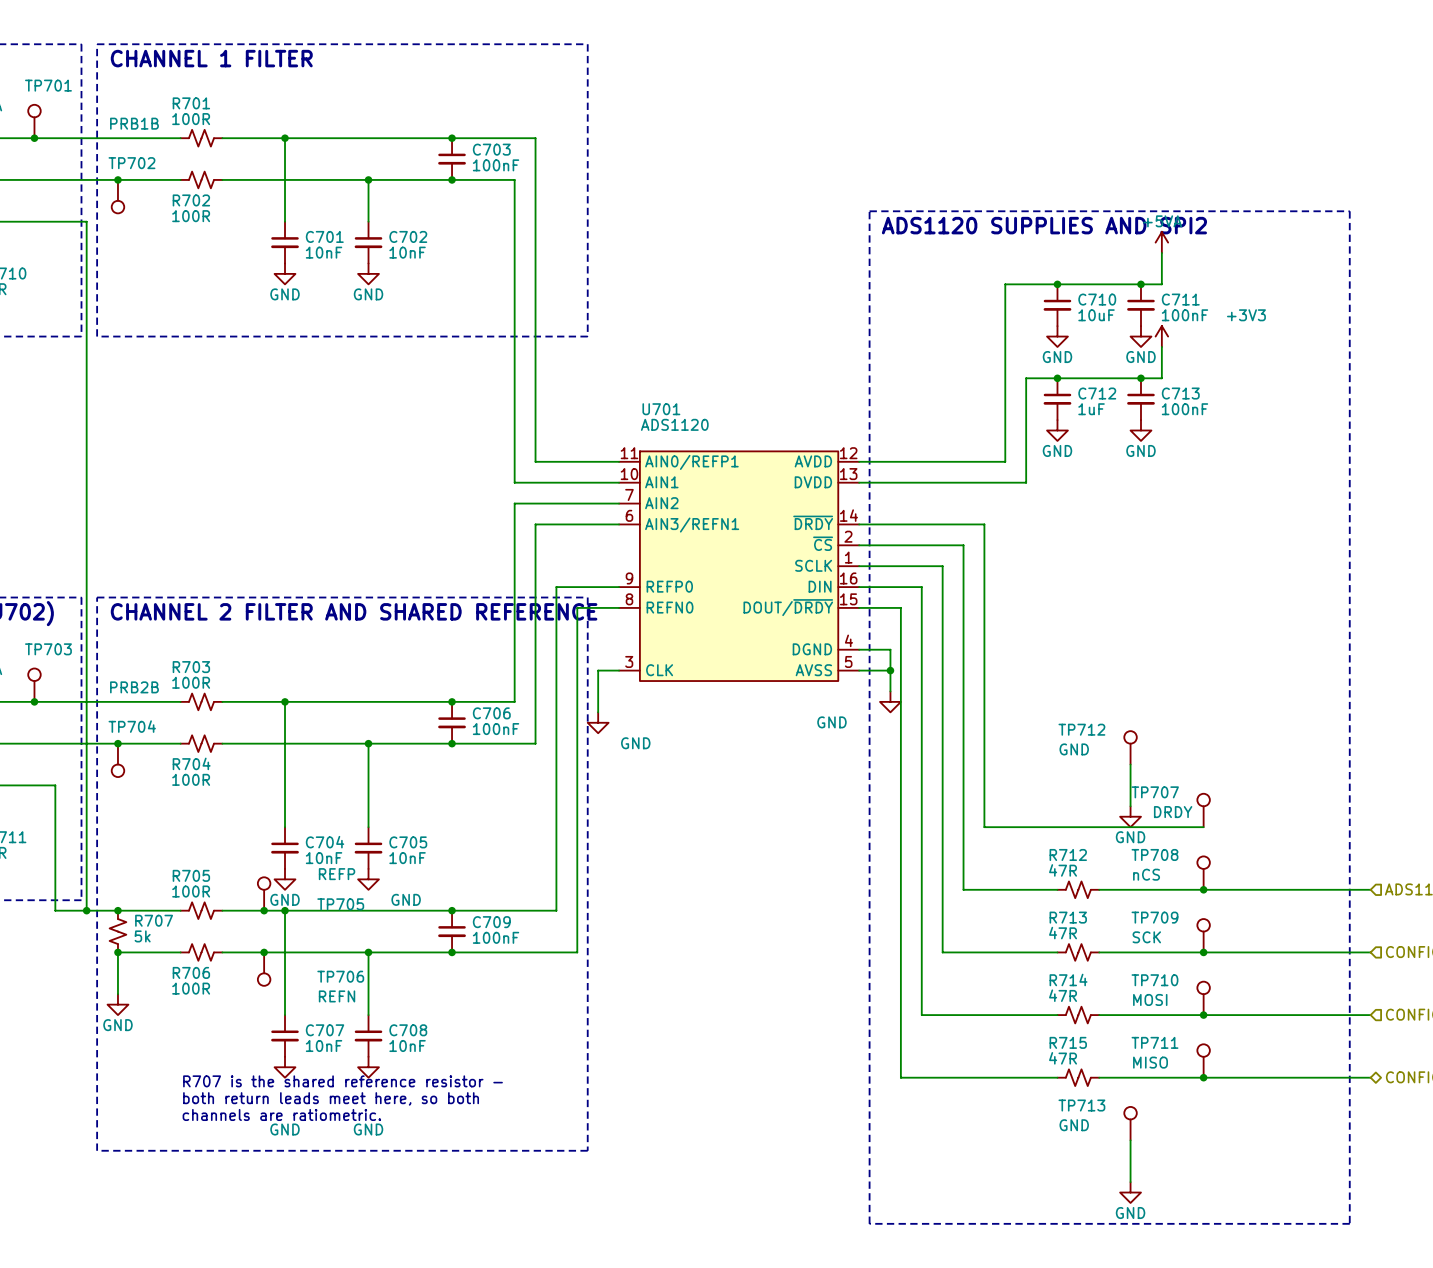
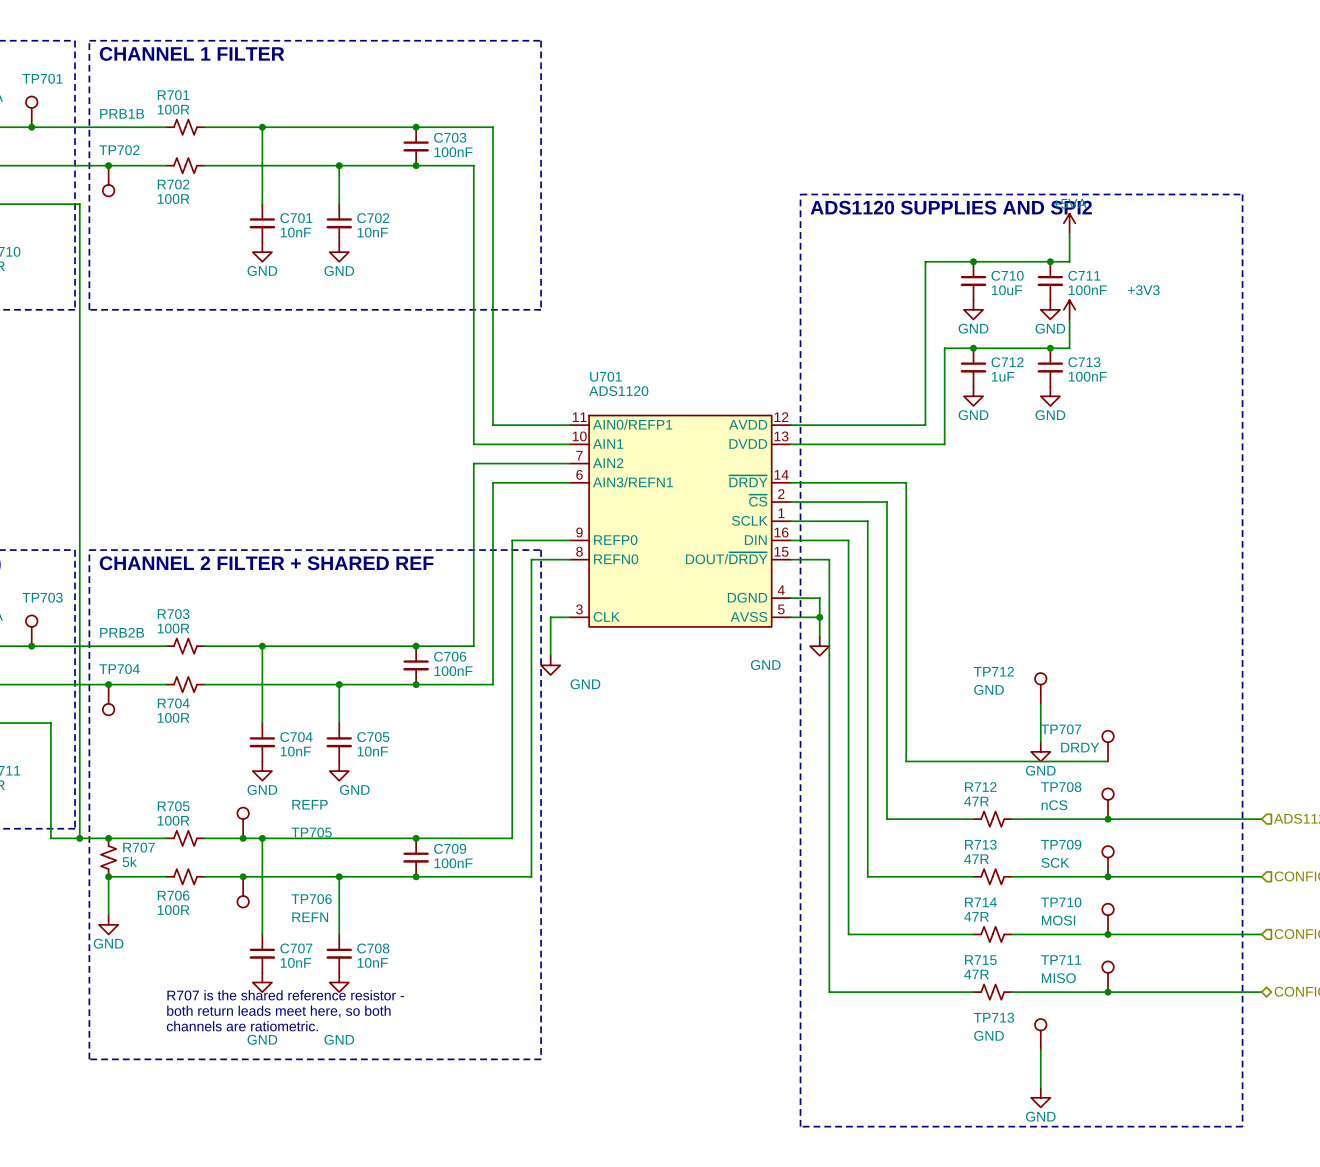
text: CHANNEL 2 FILTER AND SHARED REFERENCE (354, 611) -> CHANNEL 2 FILTER + SHARED REF (266, 563)
C704 position: (285, 848) -> (262, 742)
C705 position: (368, 848) -> (339, 742)
power symbol position: GND (285, 879) -> GND (262, 771)
power symbol position: GND (368, 879) -> GND (339, 771)
power symbol text position: GND (406, 899) -> GND (354, 789)

